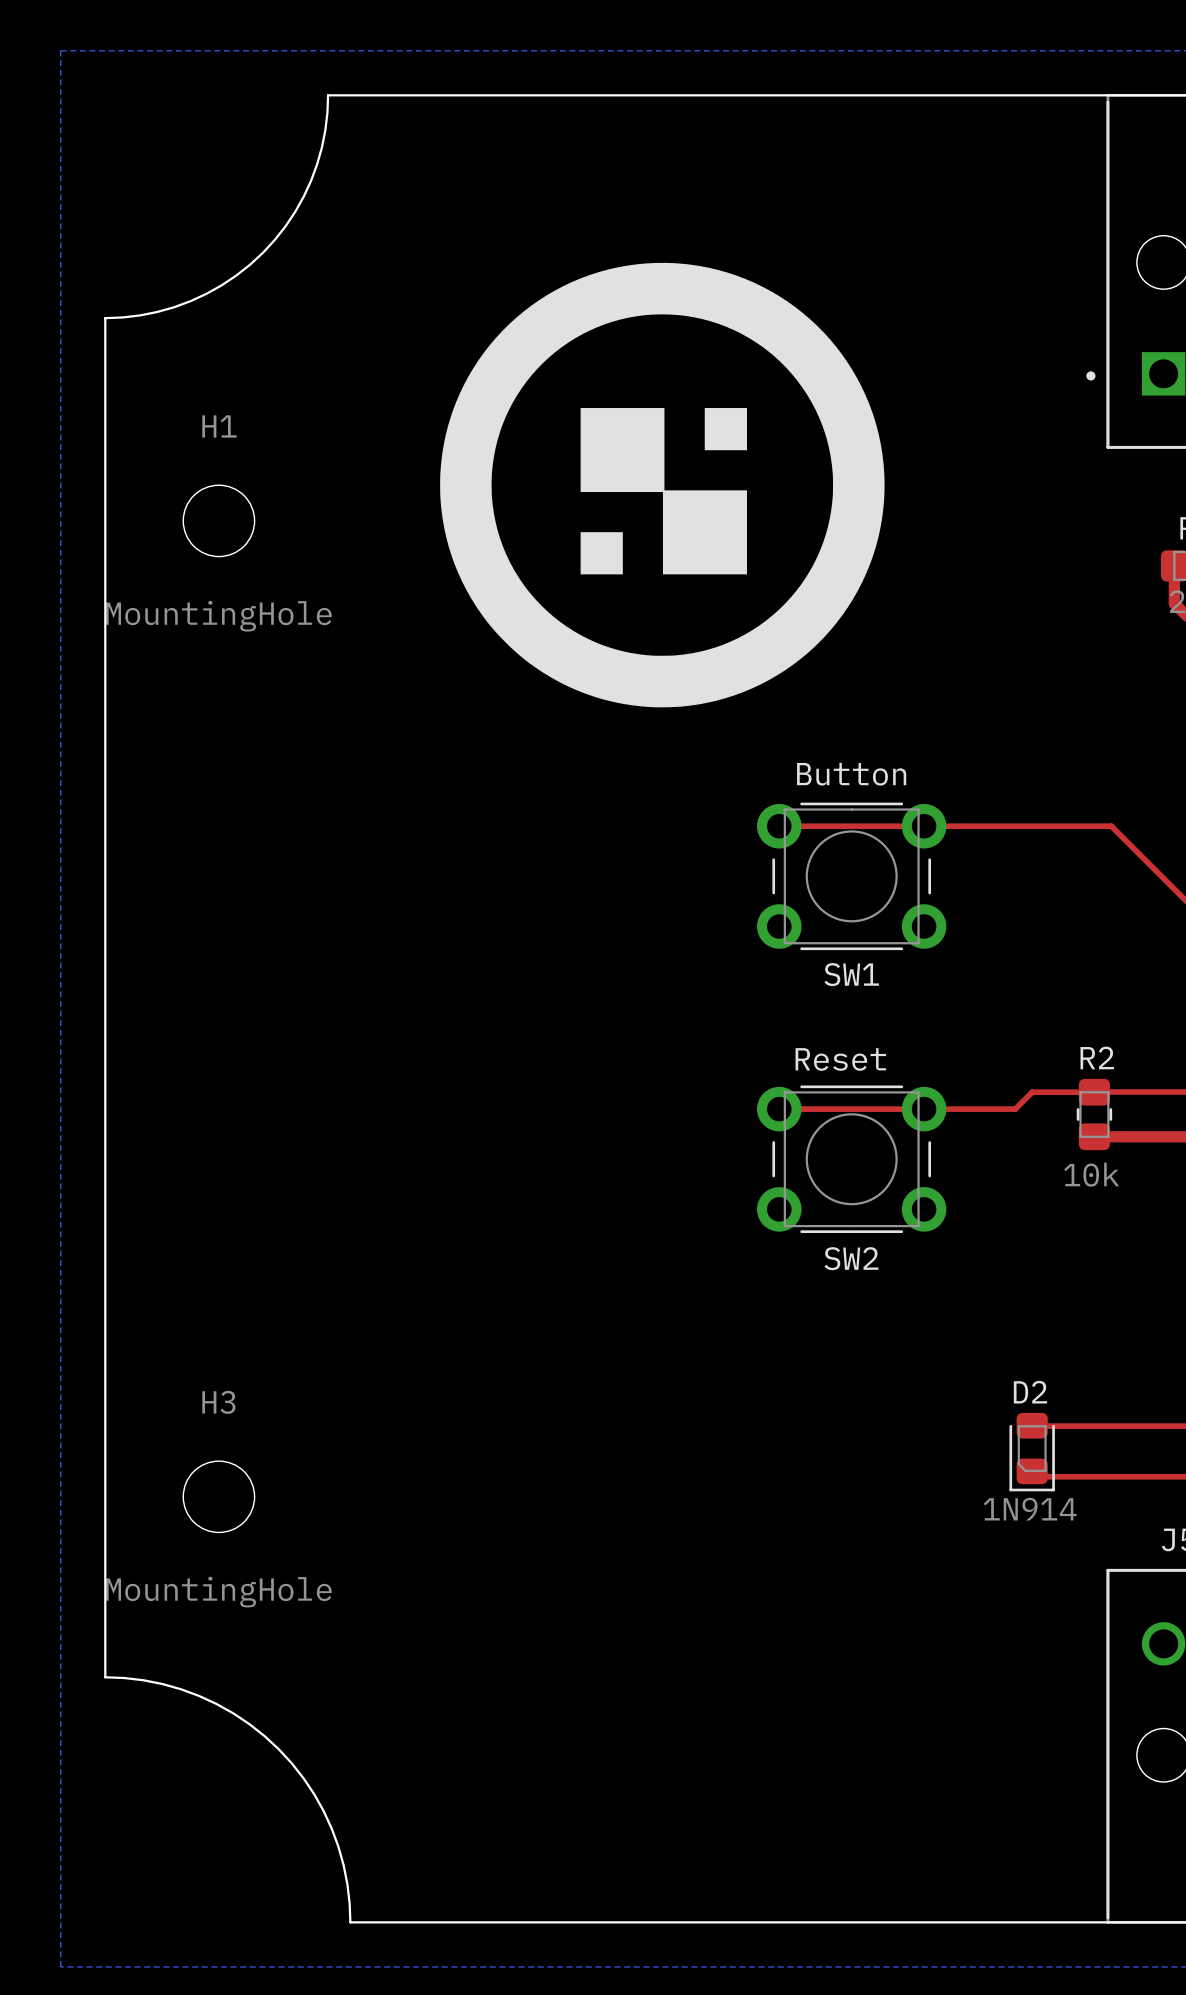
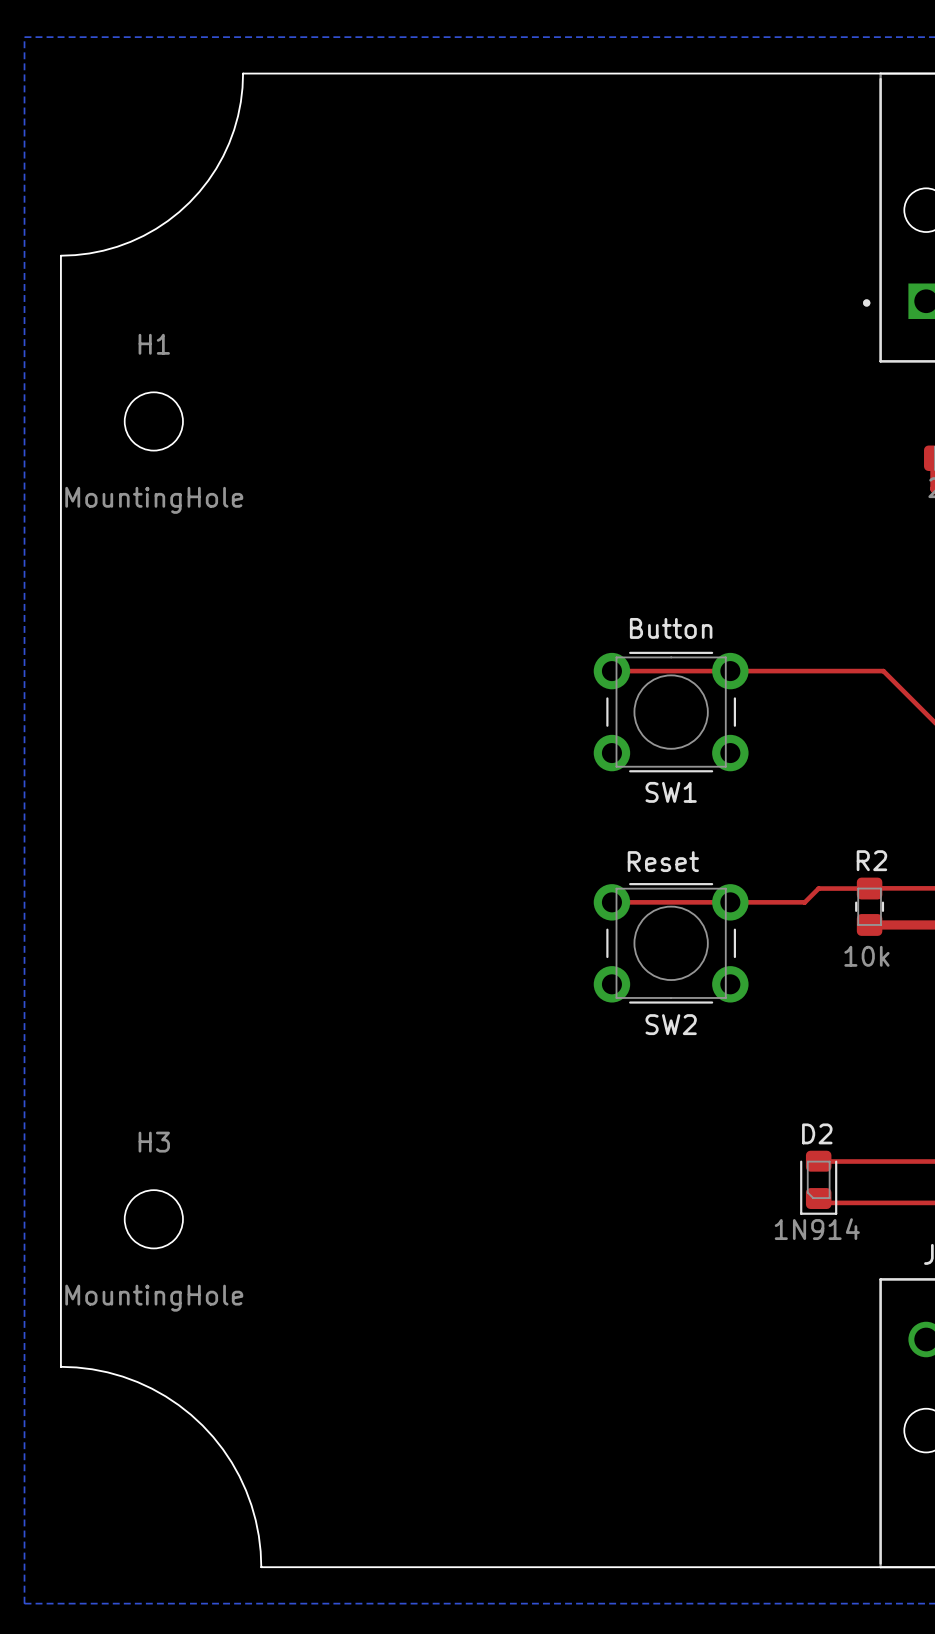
drawing: [440, 262, 885, 708] -> none

